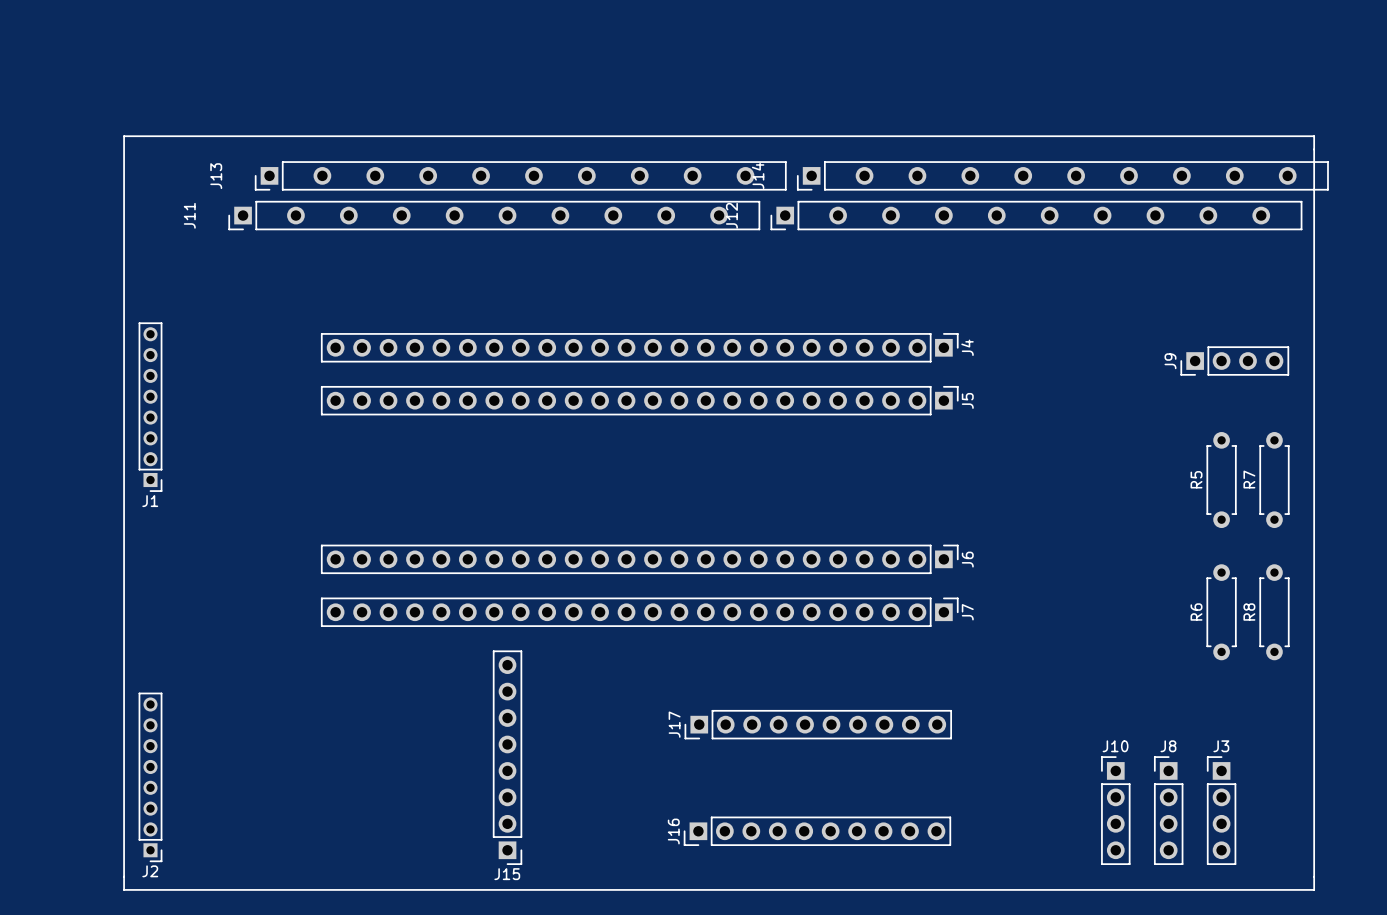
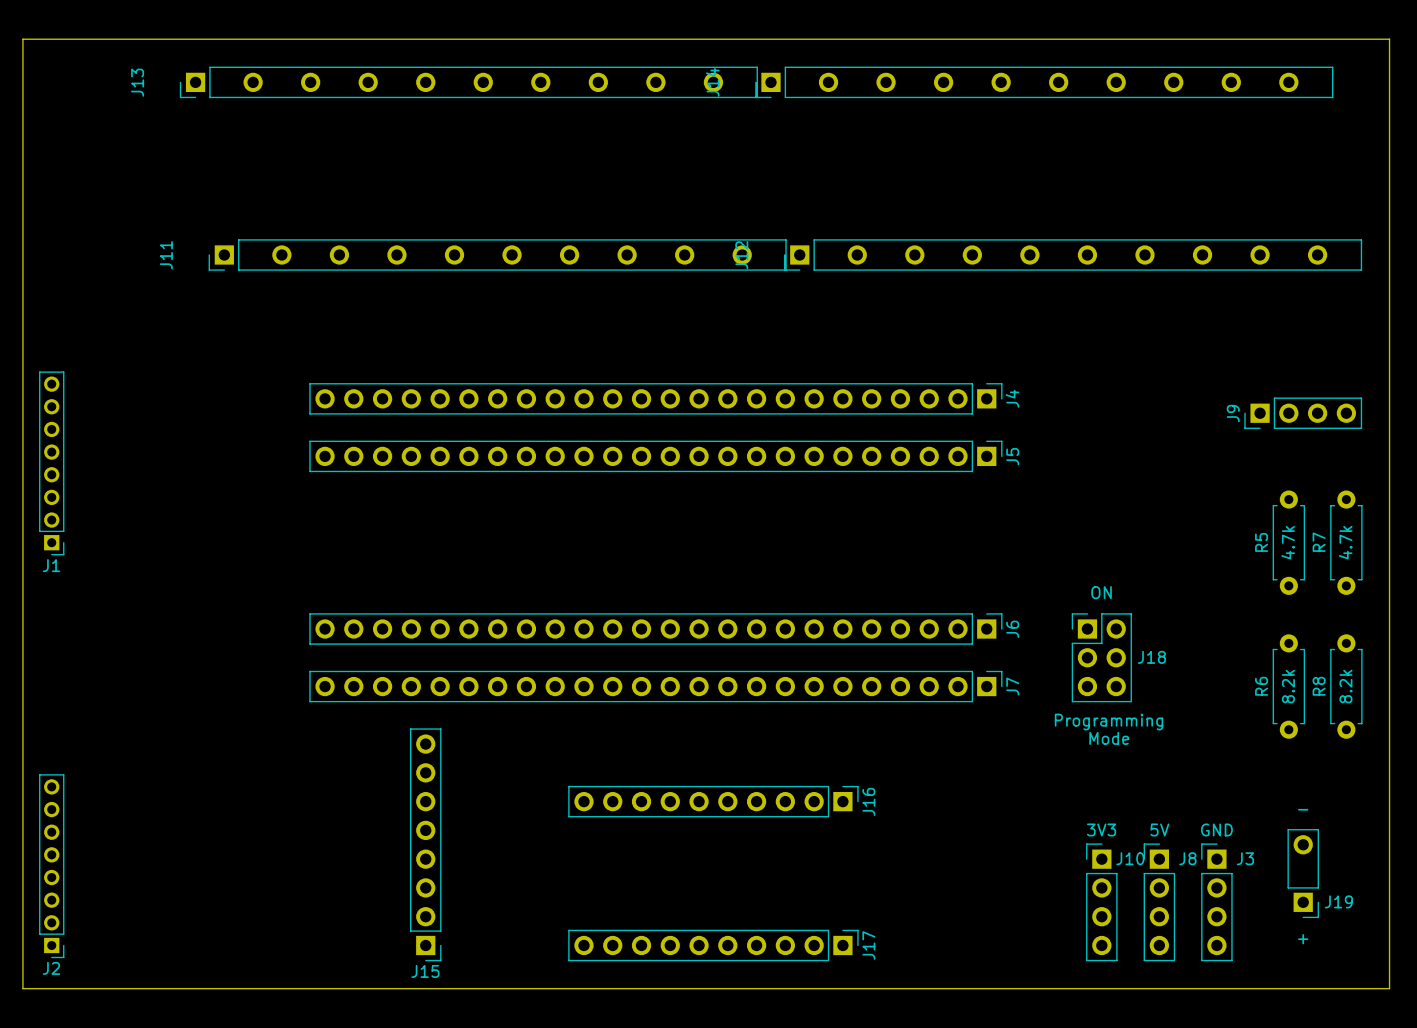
board edge: none -> (22, 39) (1389, 39) (1389, 988) (22, 988) (22, 39)
line: (124, 136) (124, 889) (1314, 889) (1314, 136) (124, 136) -> none
J13 position: (520, 175) -> (468, 82)
J14 position: (1062, 175) -> (1044, 82)
J12 position: (1036, 215) -> (1073, 254)
J1 position: (150, 407) -> (51, 463)
text: none -> 4.7k (1288, 542)
text: none -> 4.7k (1345, 542)
text: none -> ON (1101, 592)
J18: none -> (1101, 657)
text: none -> 8.2k (1288, 686)
text: none -> 8.2k (1345, 686)
text: none -> Programming (1109, 722)
text: none -> Mode (1109, 738)
J17 rotation: 0° (818, 724) -> 180° (713, 945)
J17 position: (818, 724) -> (713, 945)
text: none -> - (1303, 809)
text: none -> 3V3 (1101, 829)
text: none -> 5V (1159, 829)
text: none -> GND (1216, 829)
J10 name position: J10 (1115, 746) -> J10 (1130, 858)
J8 name position: J8 (1168, 746) -> J8 (1187, 858)
J3 name position: J3 (1221, 746) -> J3 (1245, 858)
J15 position: (507, 757) -> (425, 844)
J2 position: (150, 777) -> (51, 866)
J19: none -> (1303, 873)
J10 position: (1115, 810) -> (1101, 902)
J8 position: (1168, 810) -> (1159, 902)
J3 position: (1221, 810) -> (1216, 902)
J16 rotation: 0° (817, 831) -> 180° (713, 801)
J16 position: (817, 831) -> (713, 801)
text: none -> + (1303, 939)

